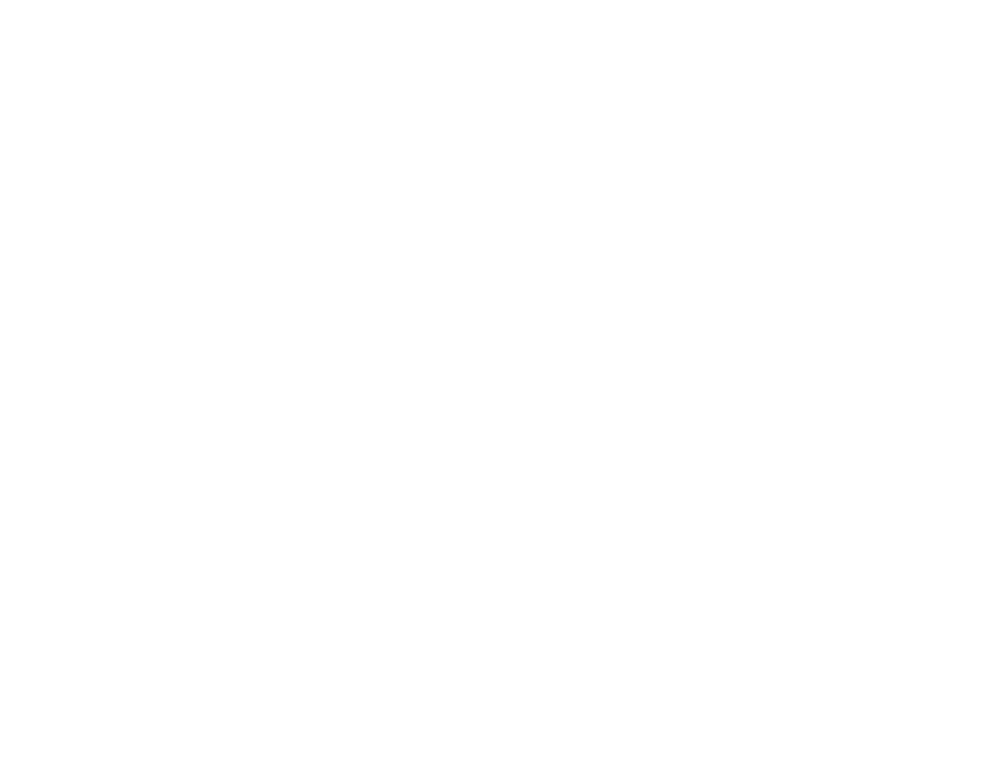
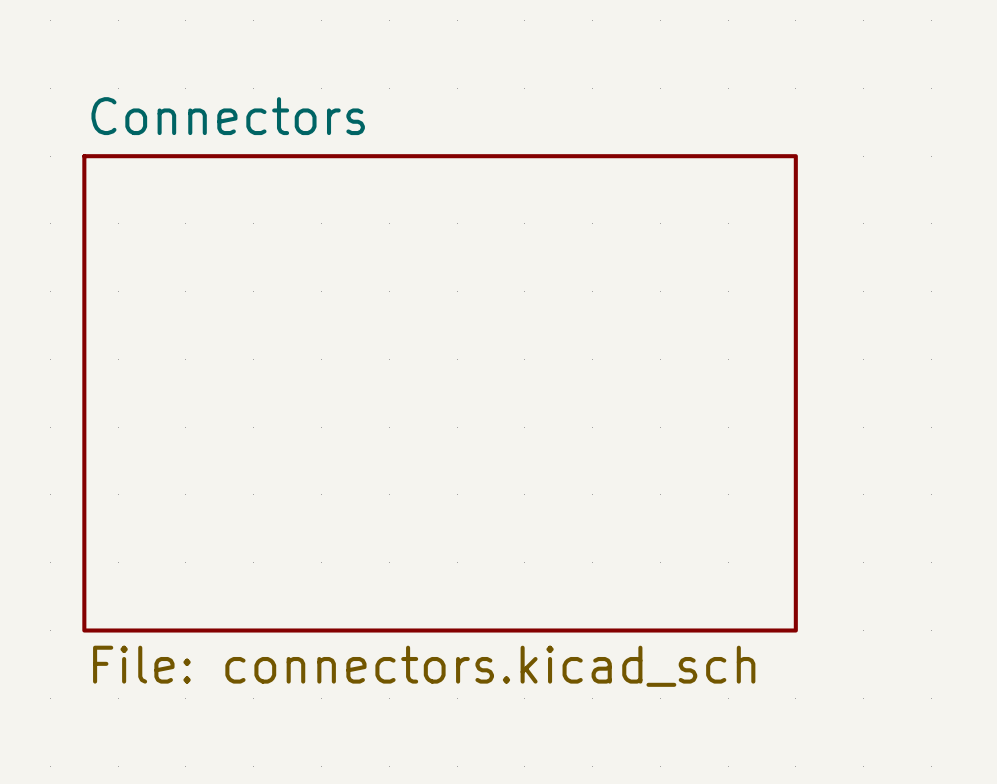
sheet Connectors: none -> File: connectors.kicad_sch (440, 393)

